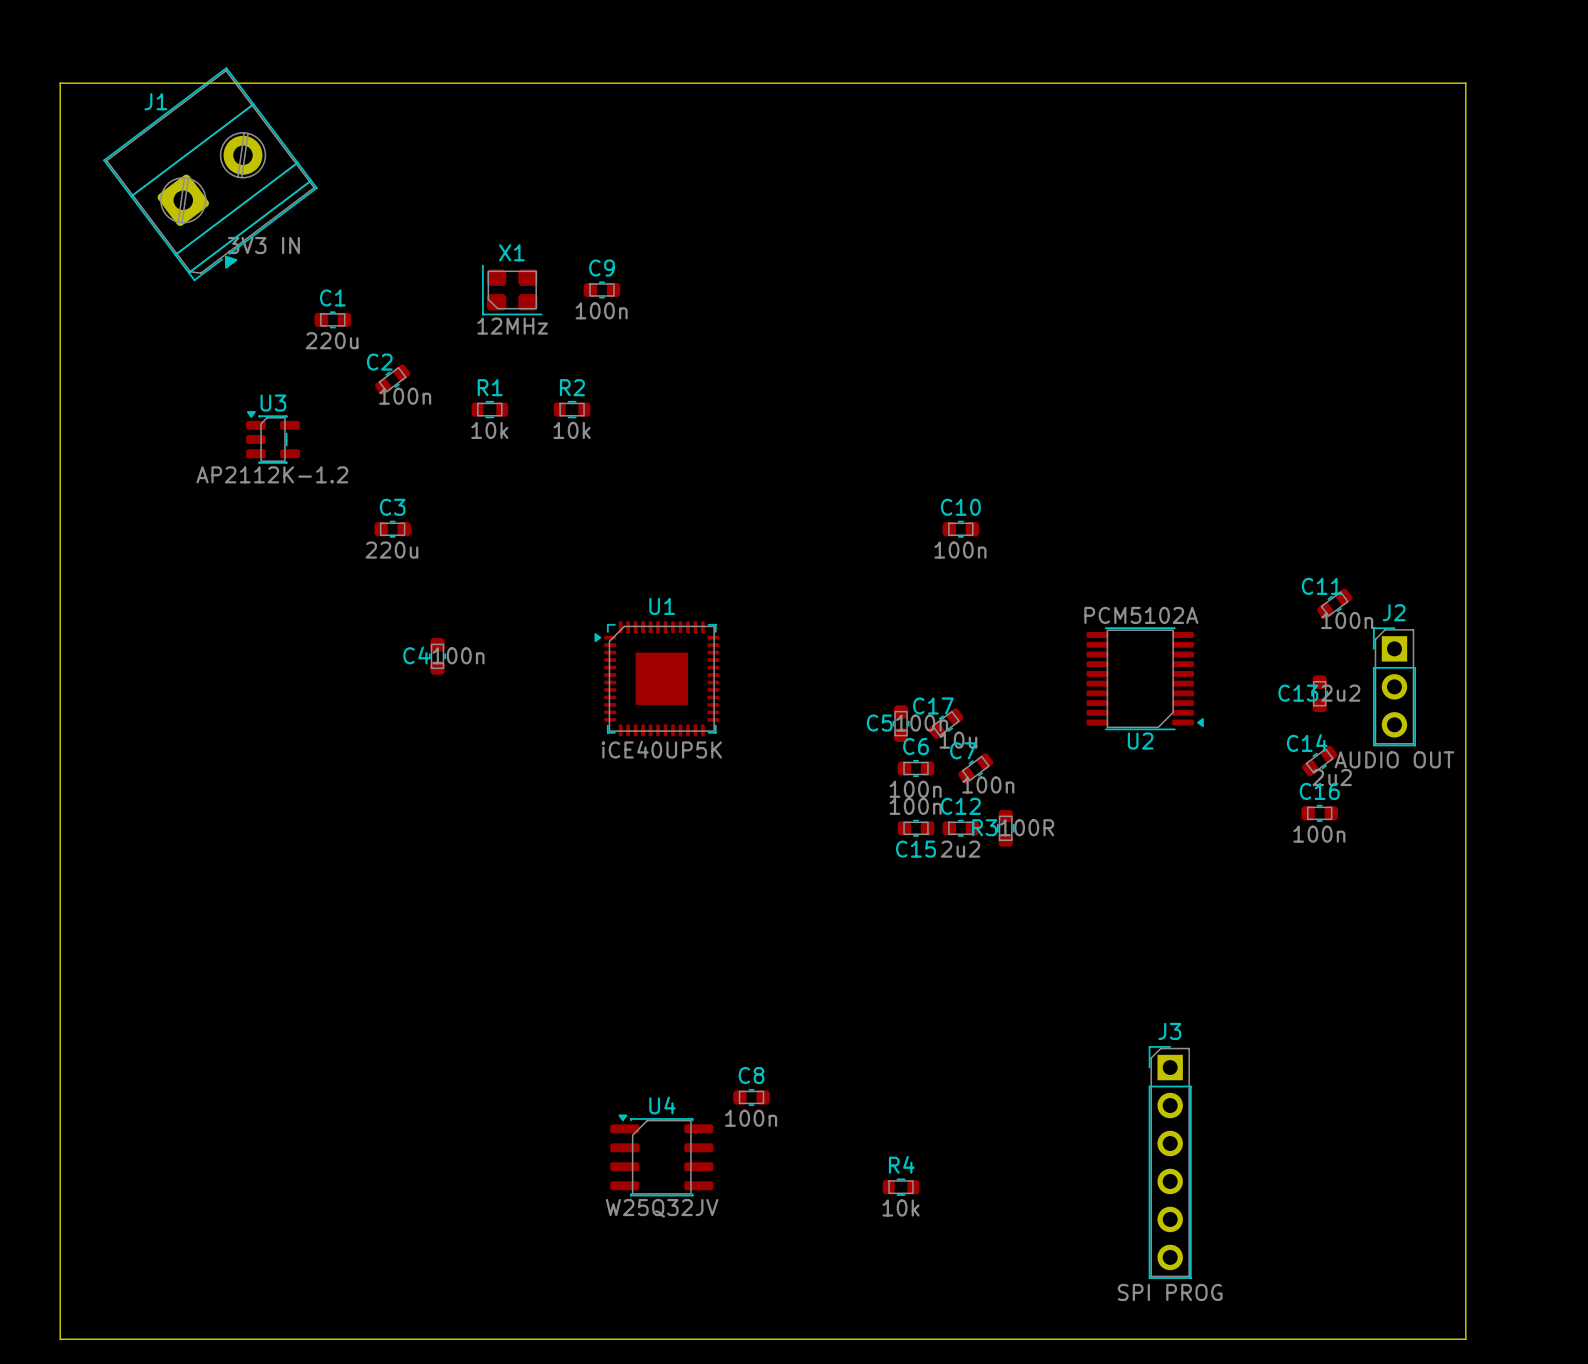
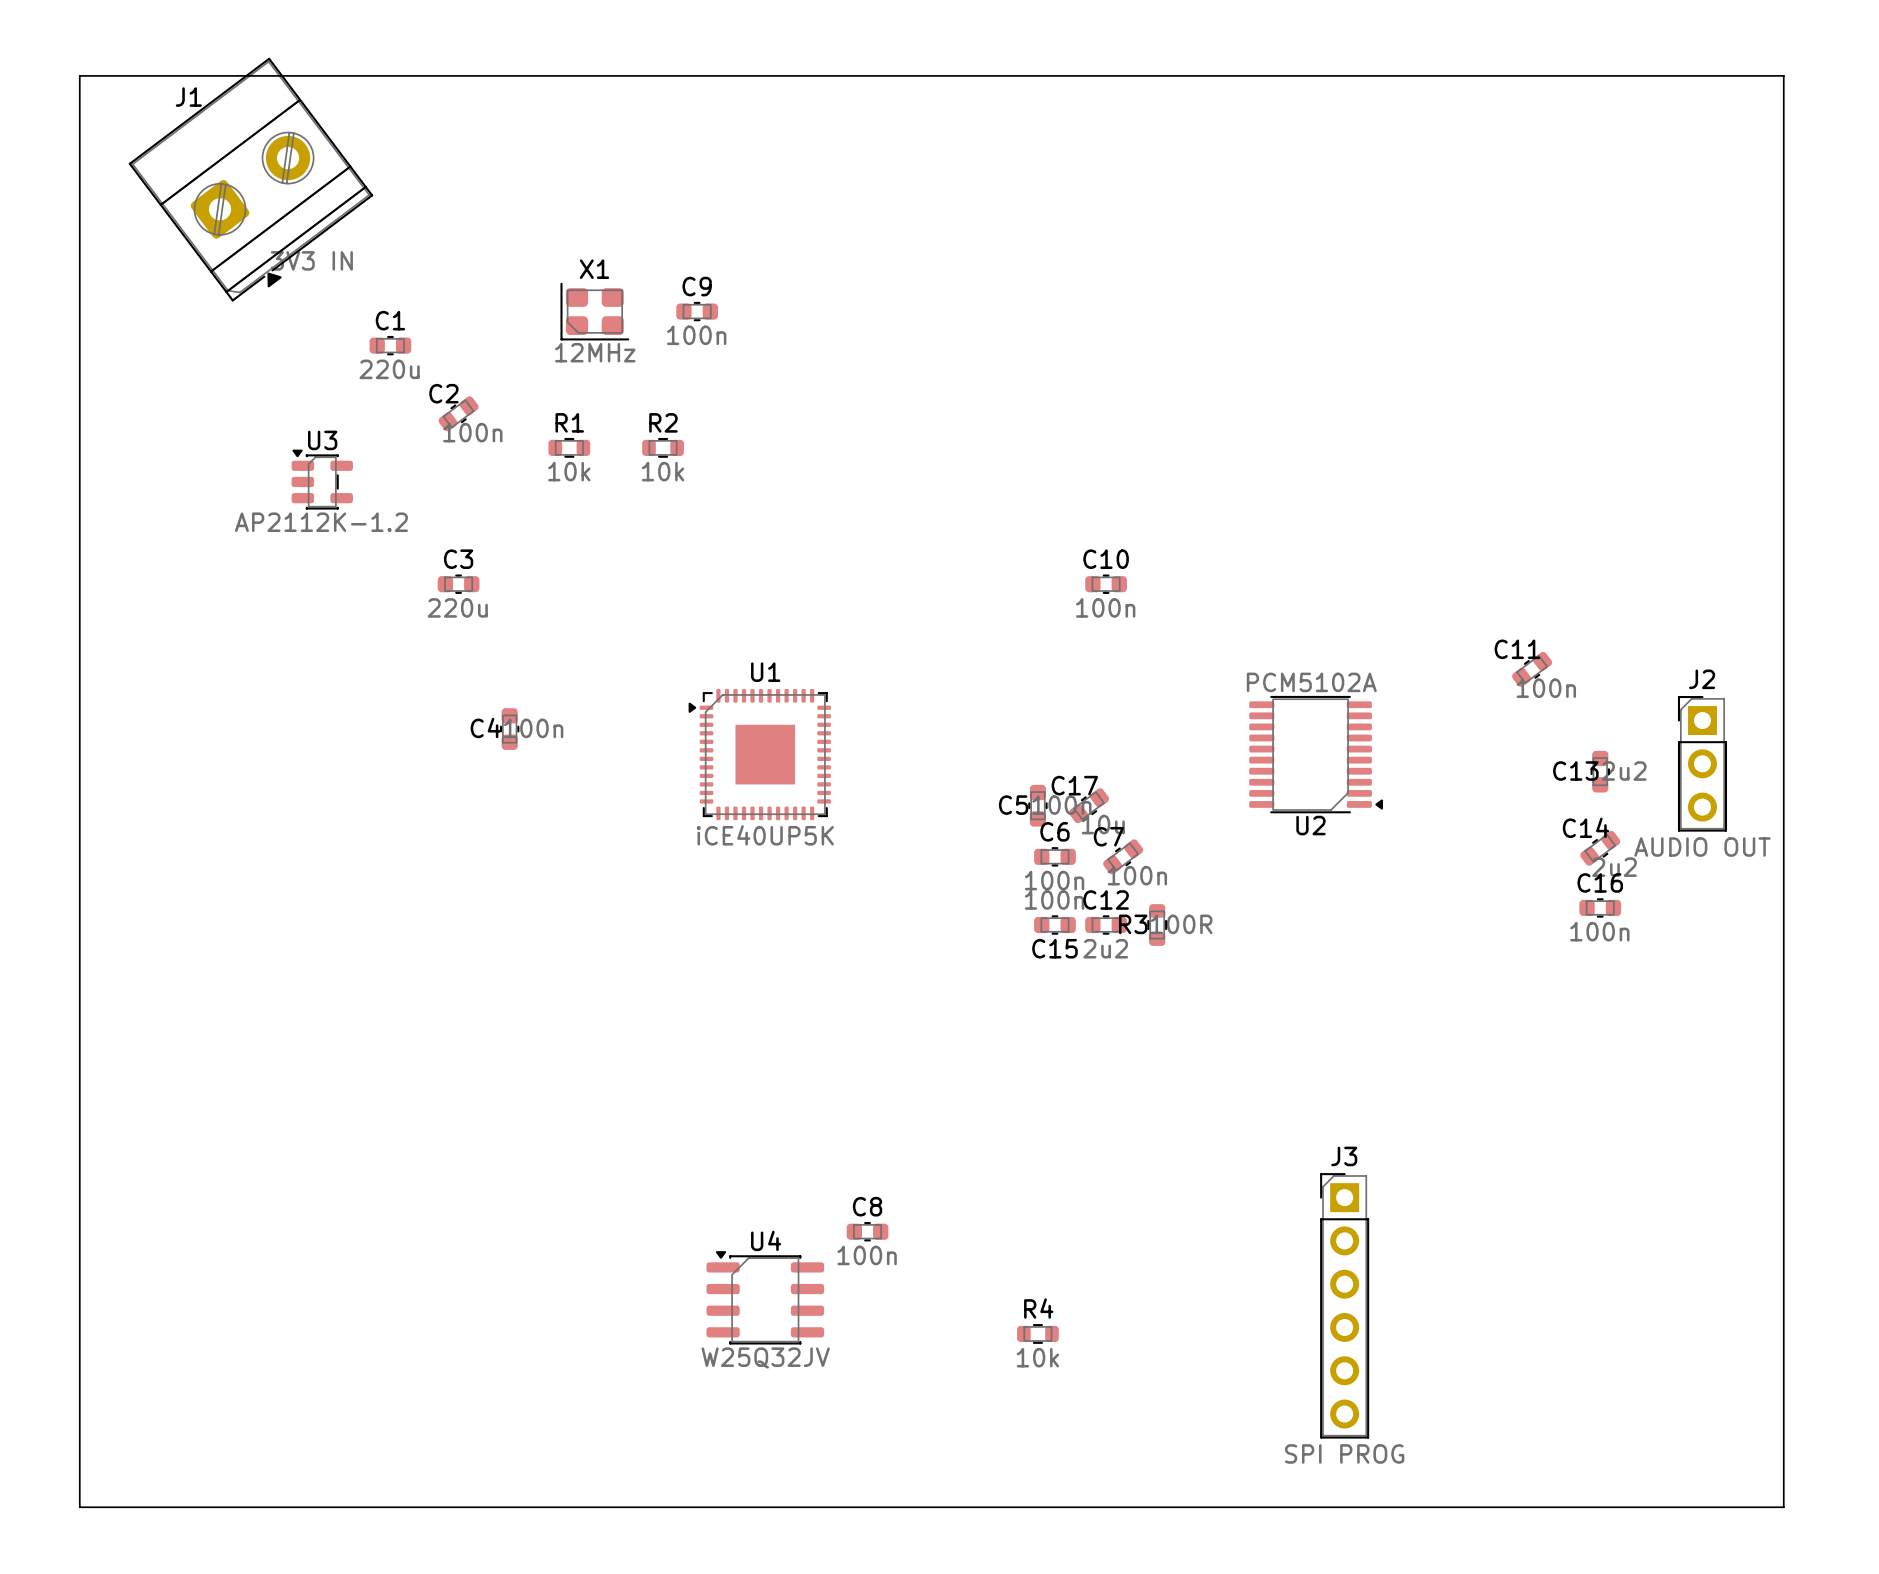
board edge: (1465, 83) (1465, 1339) -> (1681, 75) (1783, 75) (1783, 1507) (1681, 1507)
J2 position: (1394, 686) -> (1702, 763)
C13 position: (1319, 693) -> (1600, 771)
C14 position: (1319, 761) -> (1600, 848)
C16 position: (1319, 813) -> (1600, 907)

